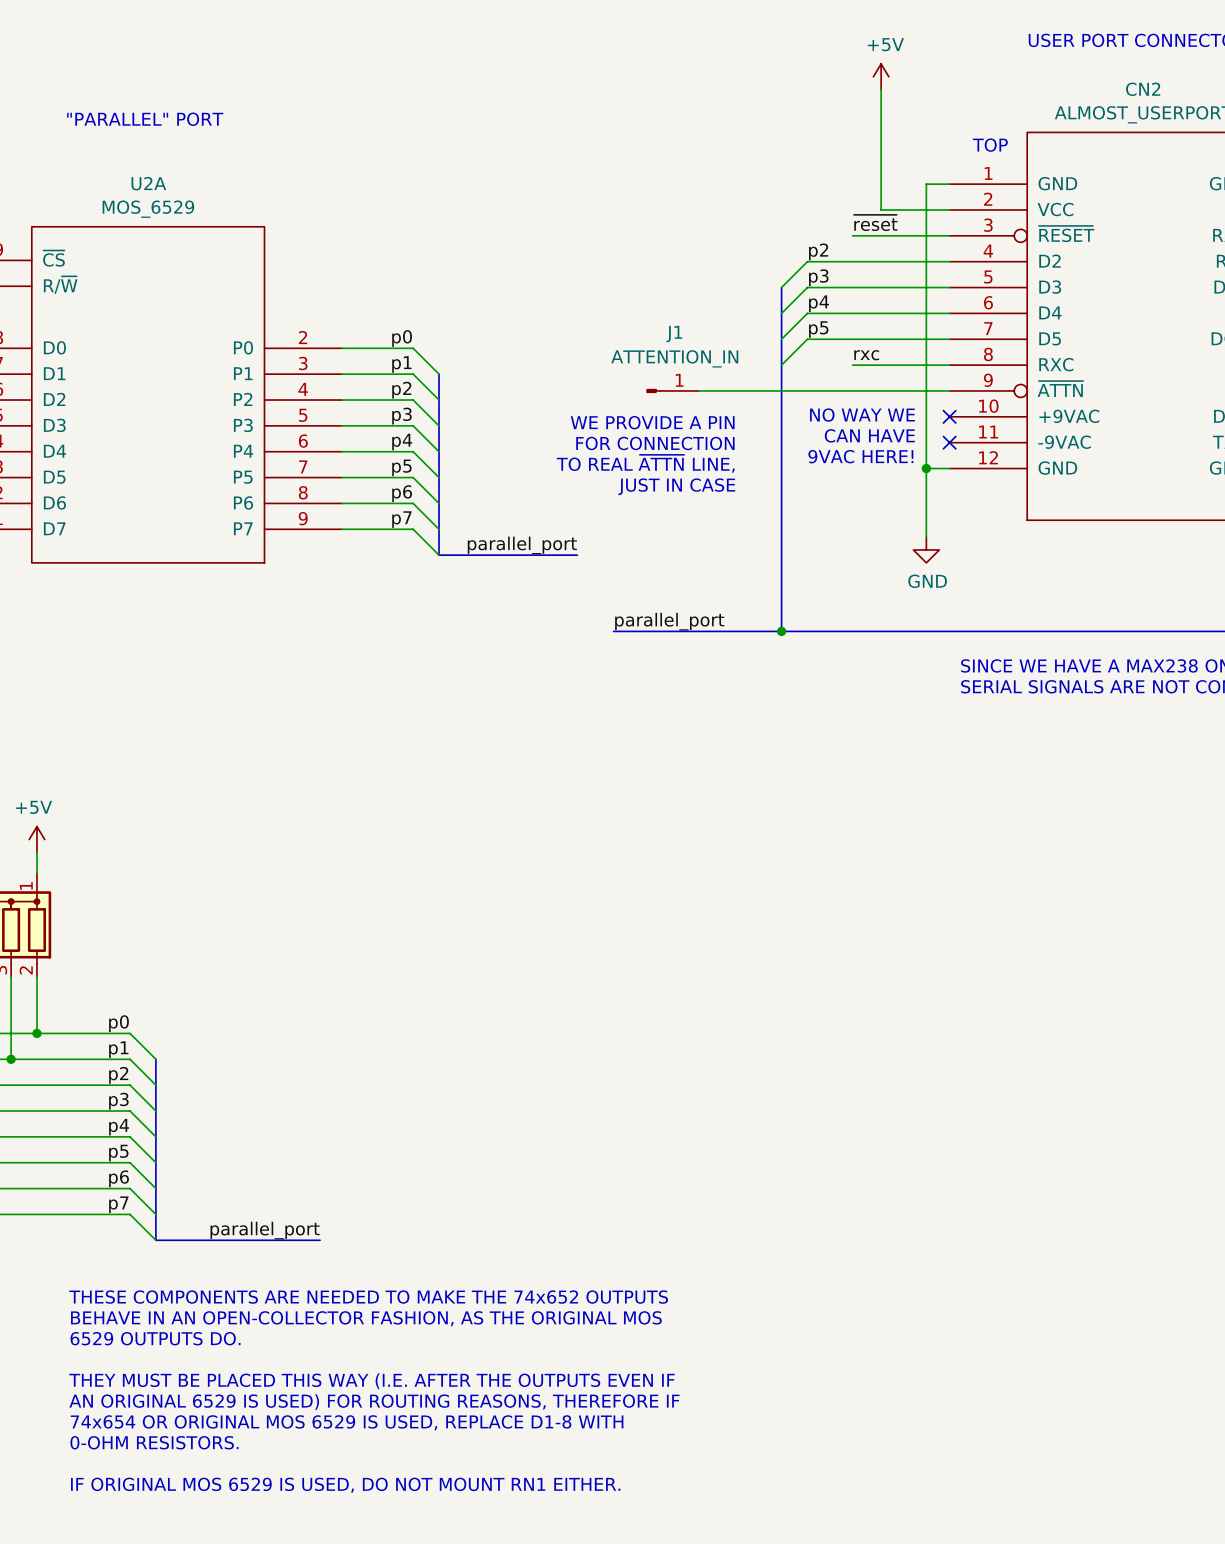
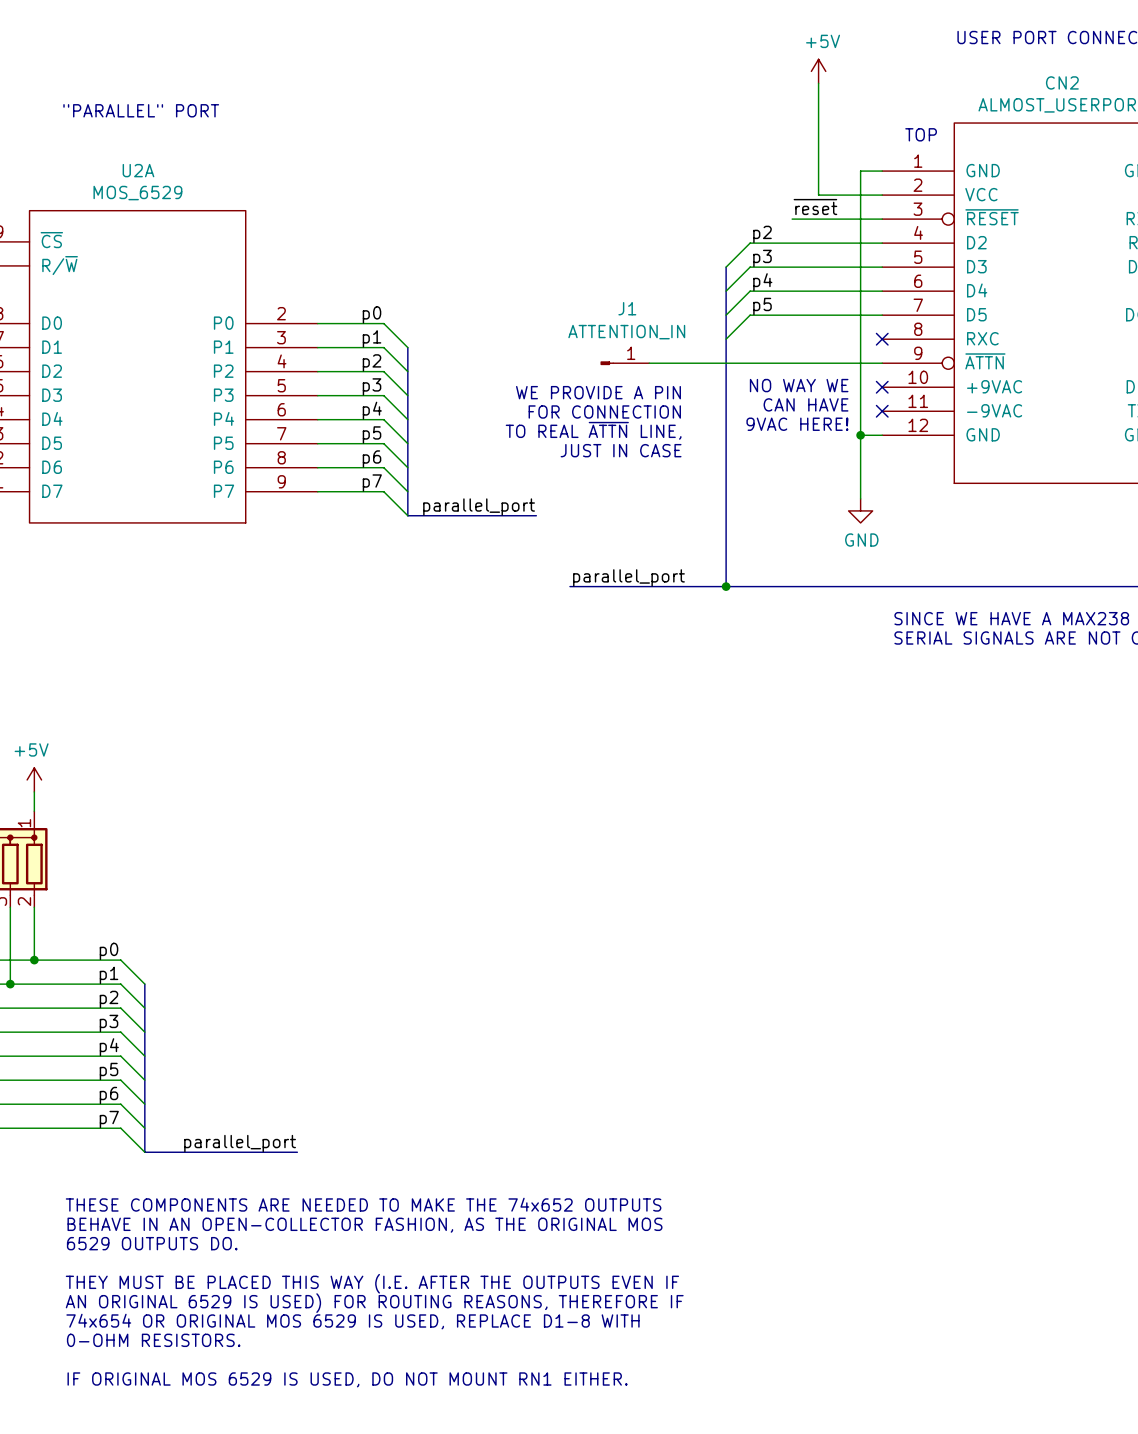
label: rxc (866, 355) -> none
wire: (852, 365) (949, 365) -> none
no-connect mark: none -> (882, 339)

